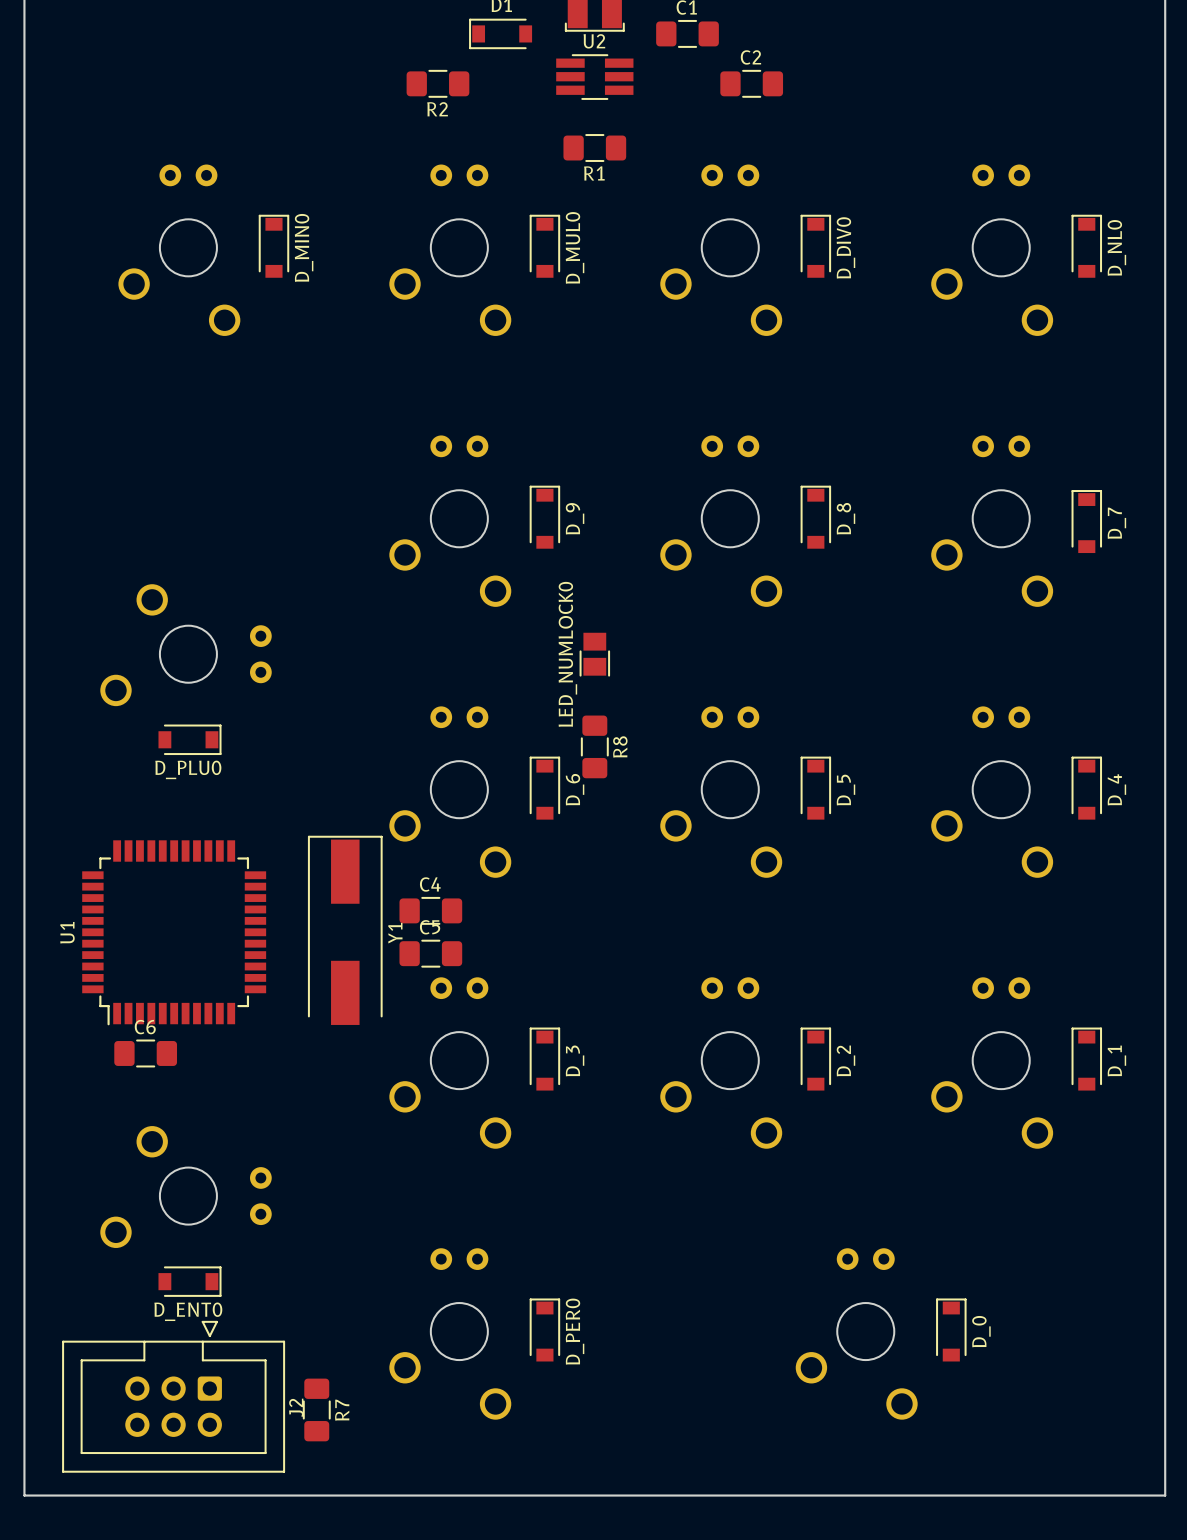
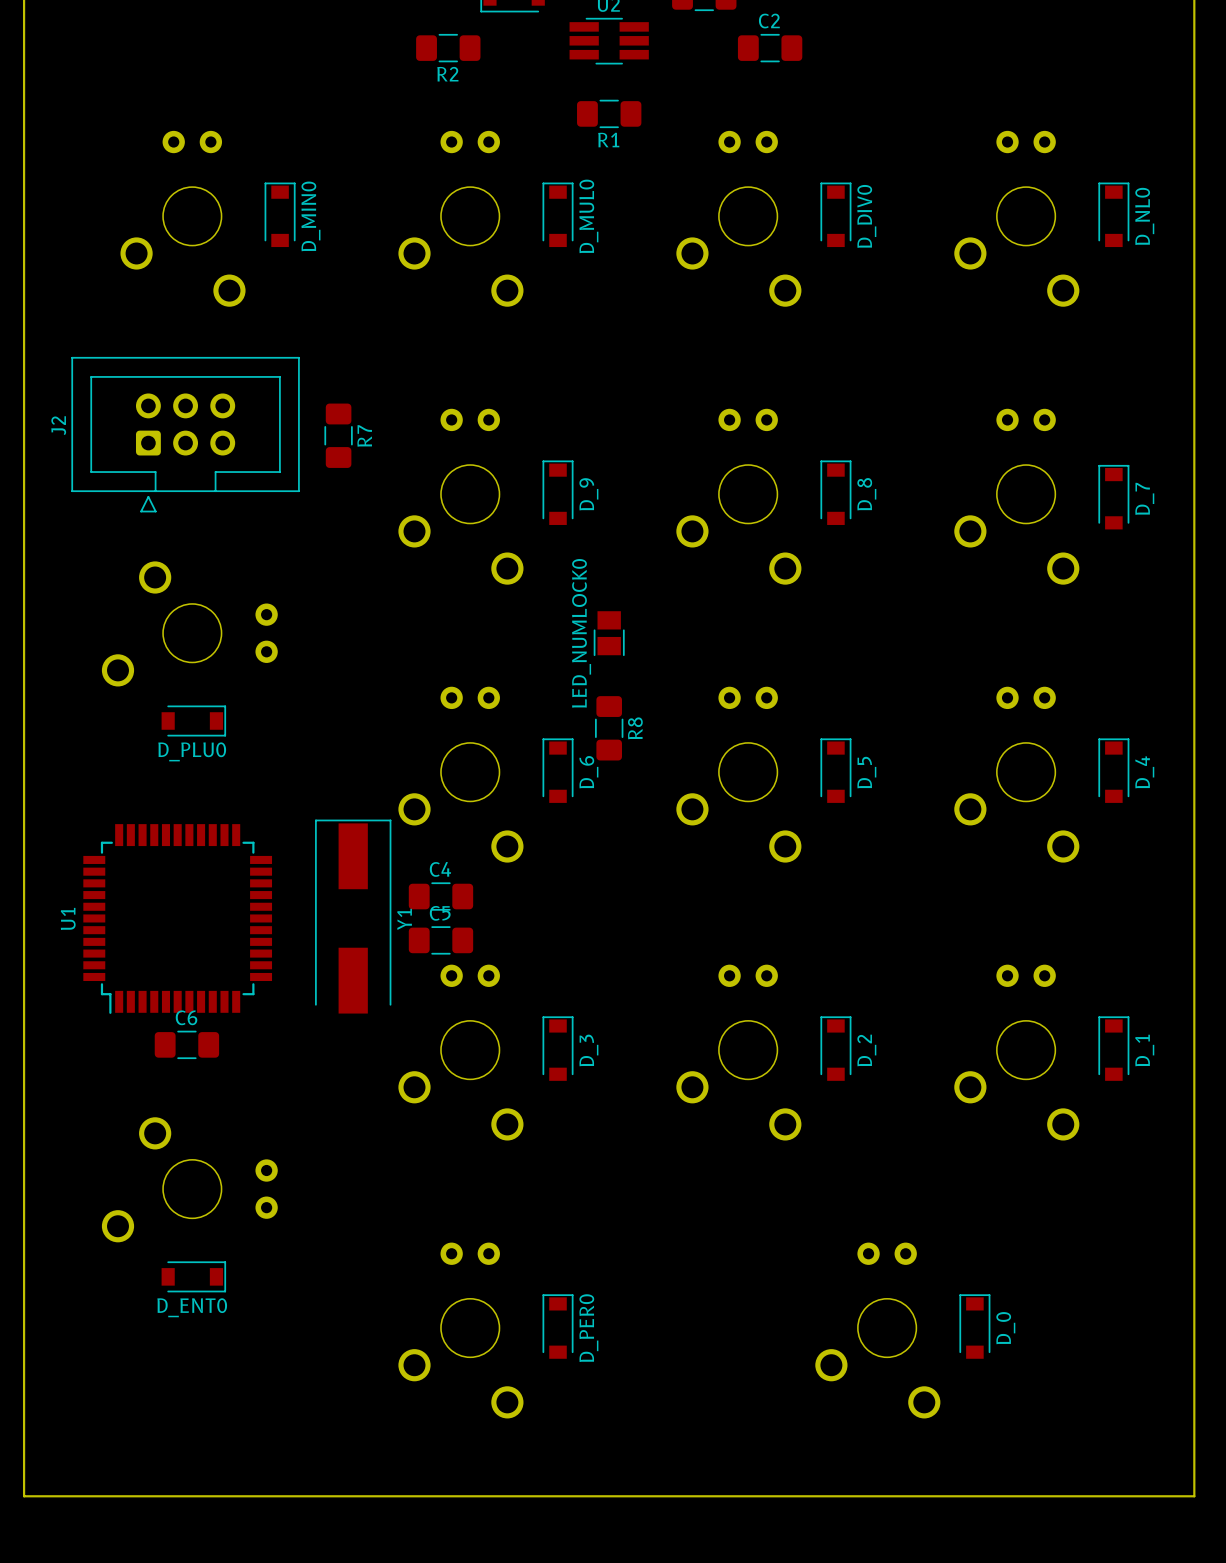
C6 position: (145, 1053) -> (186, 1044)
J2 rotation: 0° (173, 1396) -> 180° (185, 434)
J2 position: (173, 1396) -> (185, 434)
R7 position: (316, 1409) -> (338, 435)

